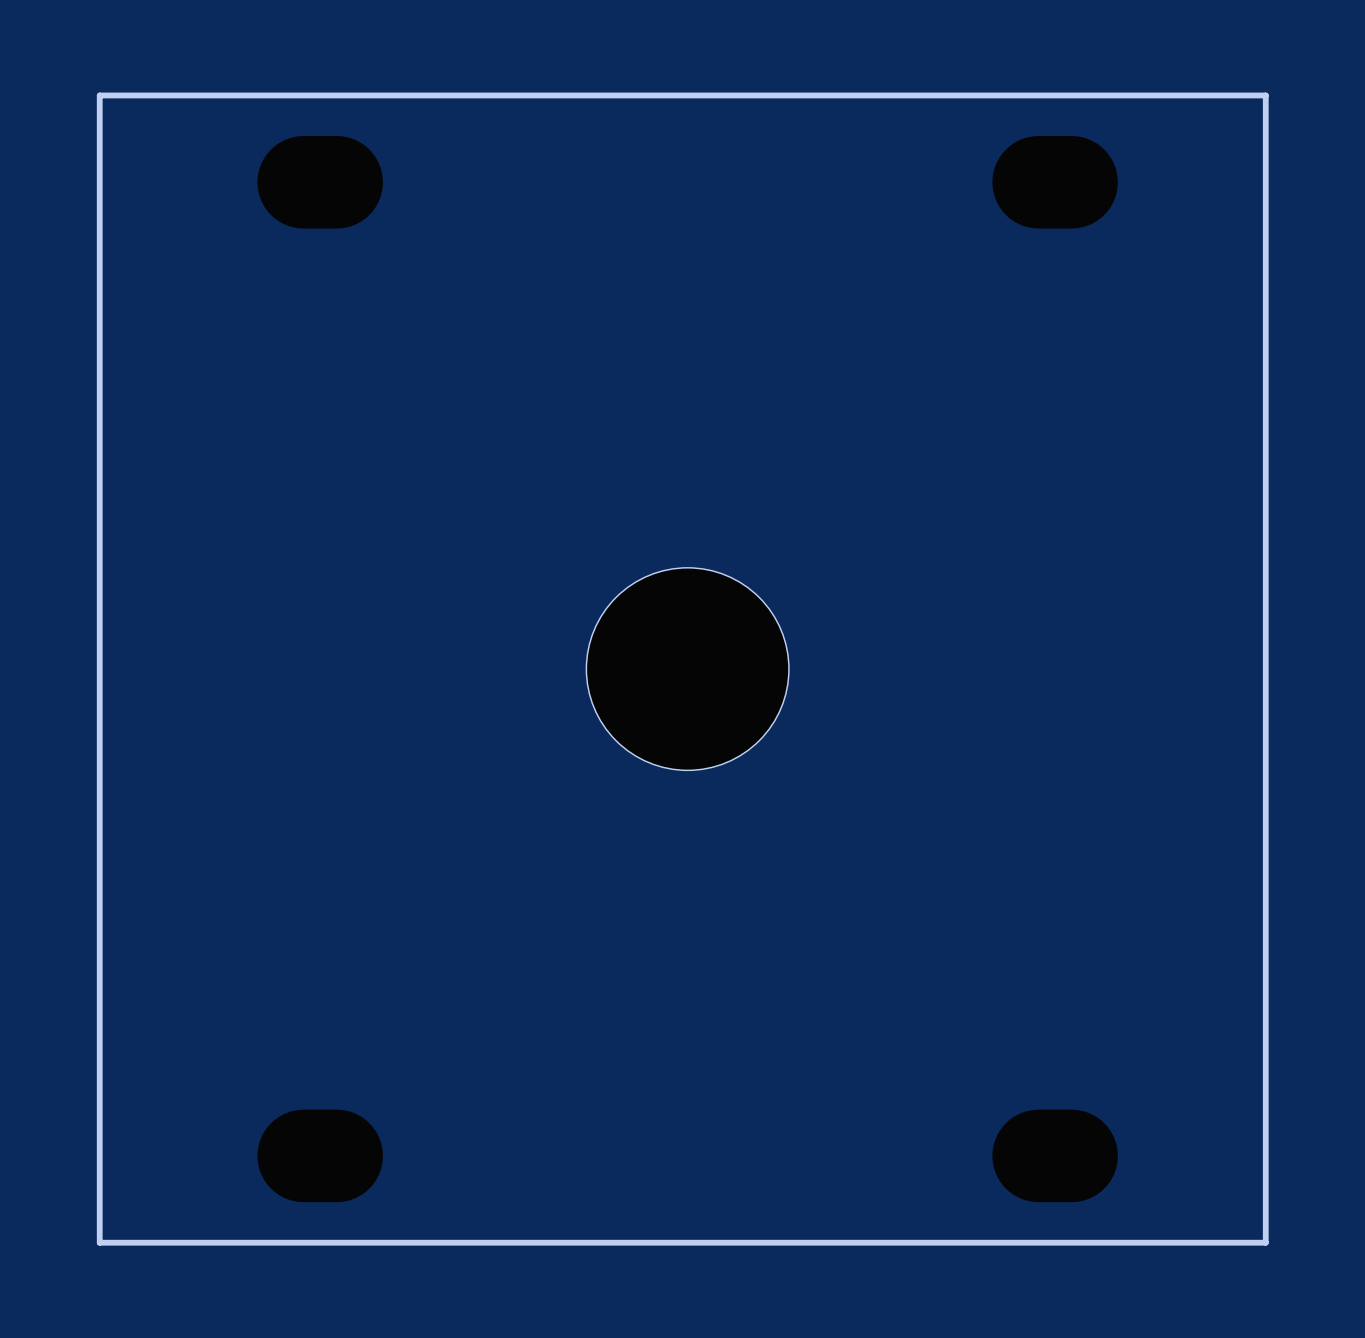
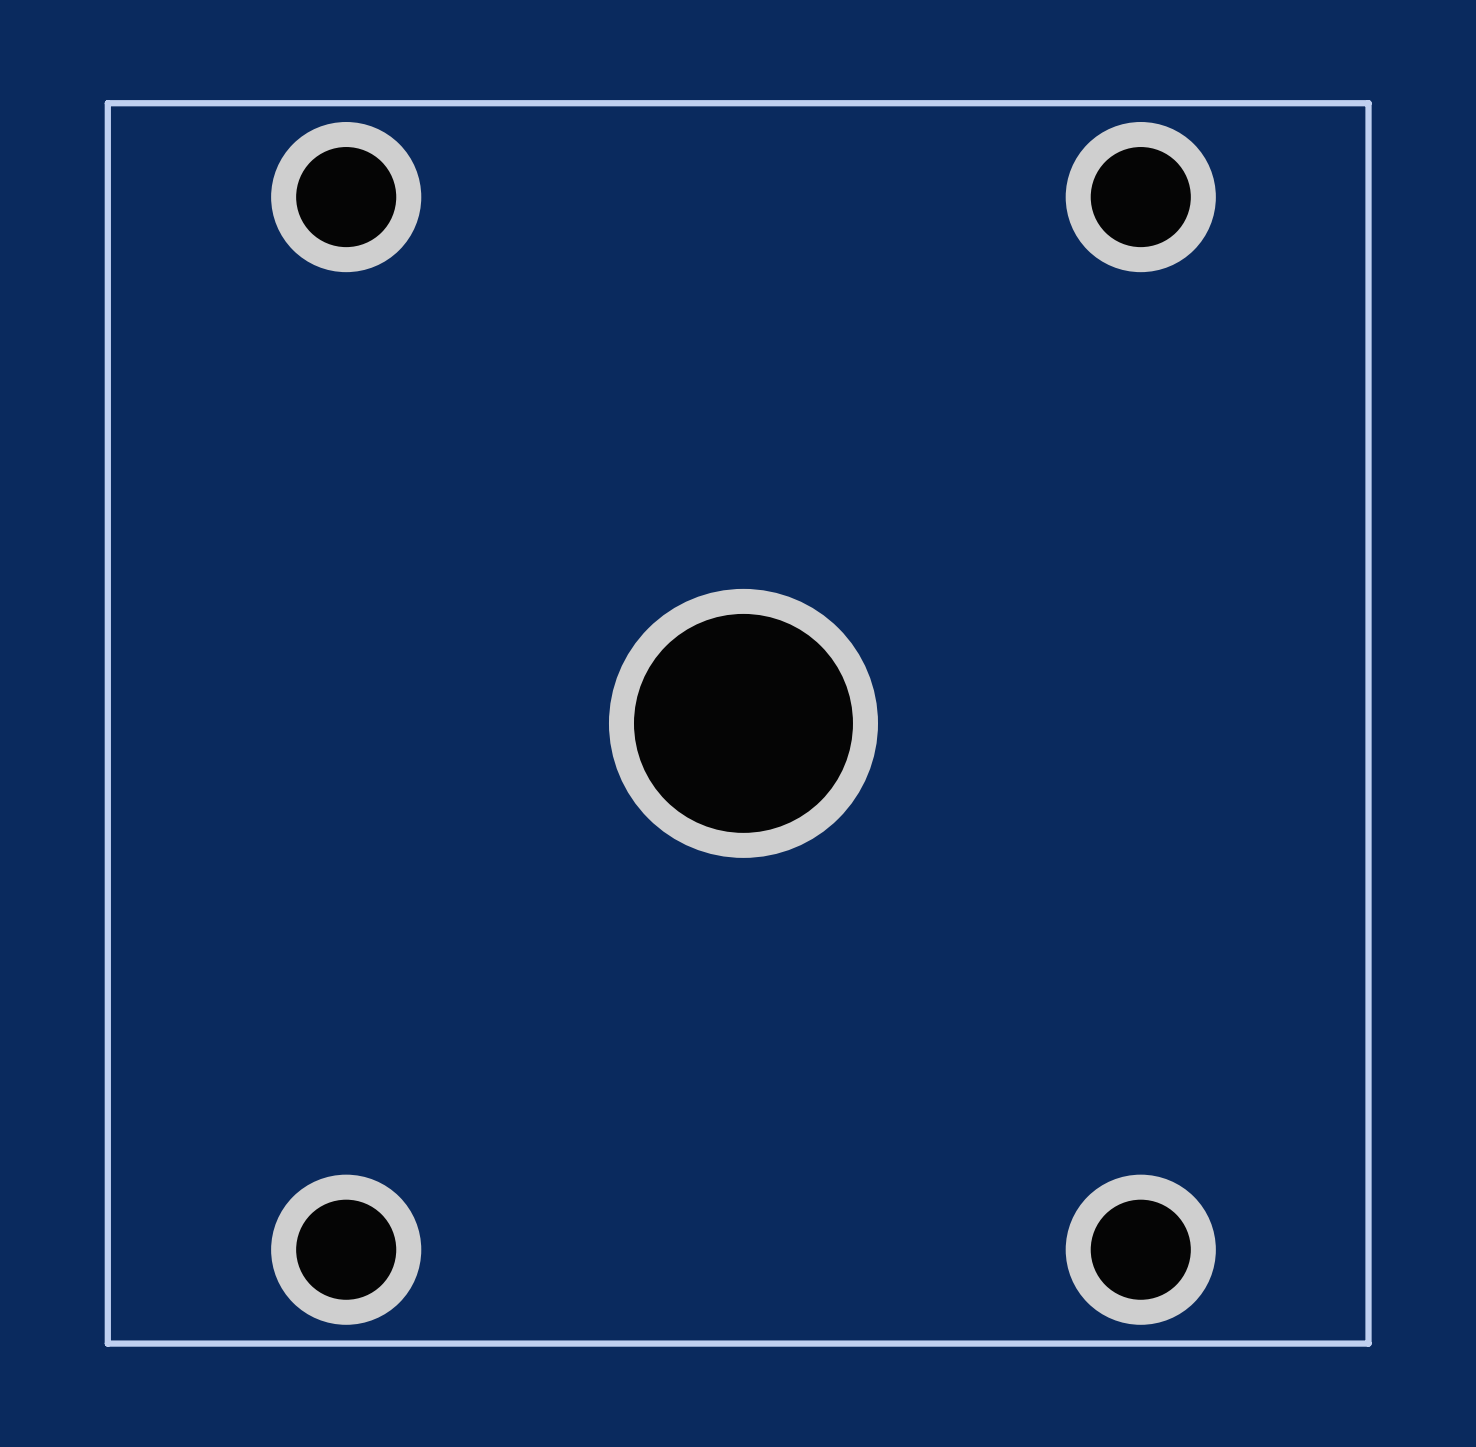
part footprint: [257, 135, 383, 229] -> [271, 121, 422, 273]
part footprint: [992, 135, 1118, 229] -> [1065, 121, 1216, 273]
part footprint: [586, 567, 789, 771] -> [608, 588, 879, 858]
part footprint: [257, 1109, 383, 1203] -> [271, 1174, 422, 1325]
part footprint: [992, 1109, 1118, 1203] -> [1065, 1174, 1216, 1325]

